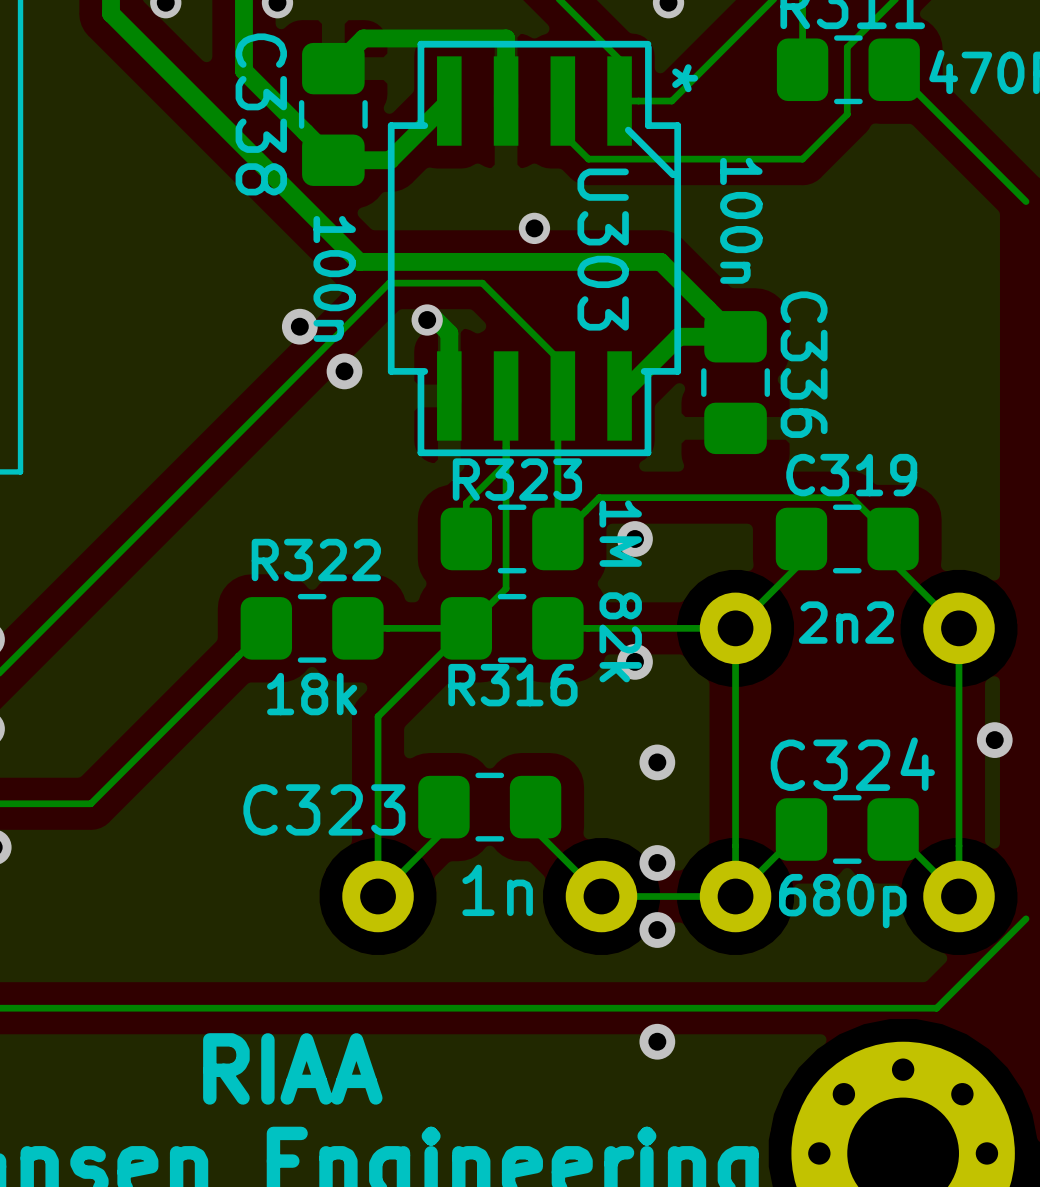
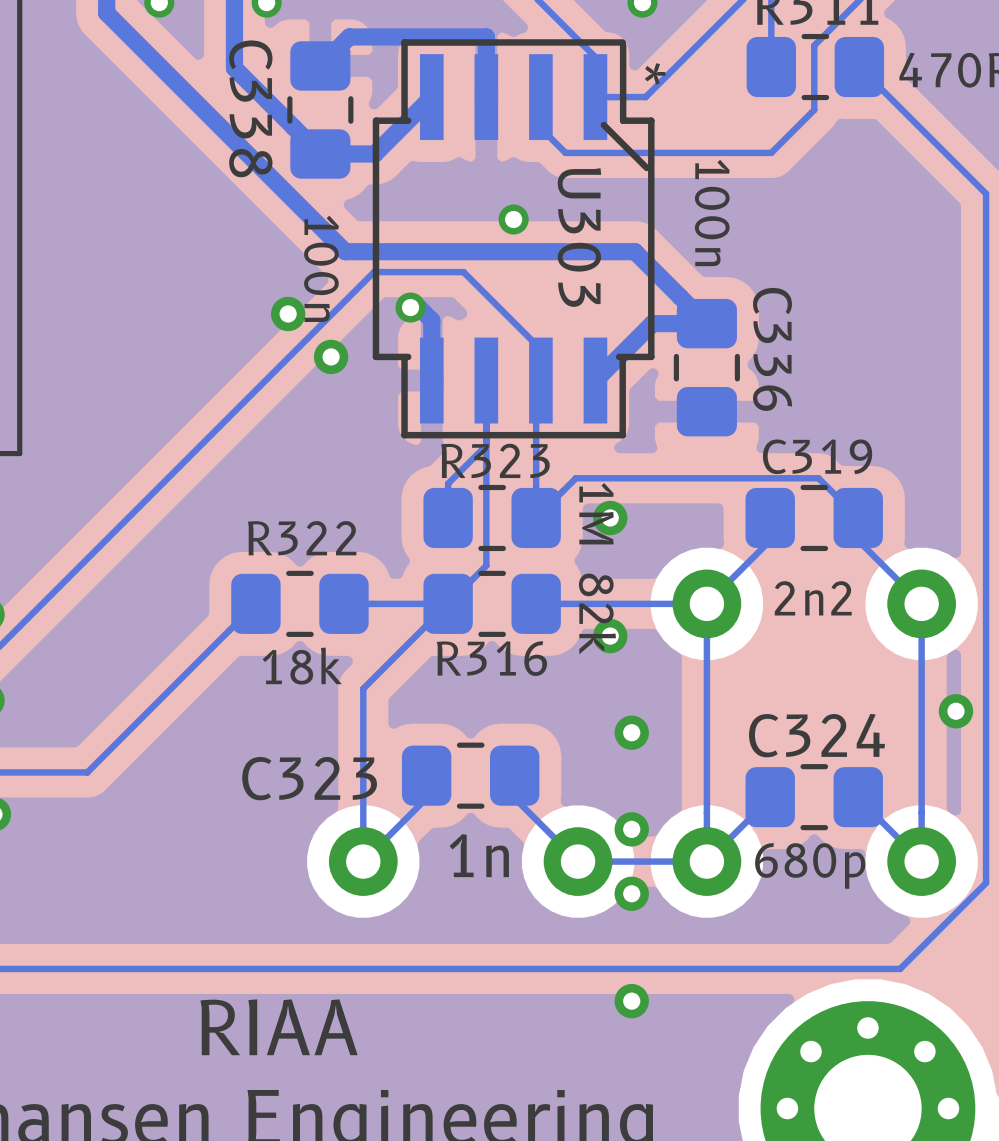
bottom track: none -> (986, 193) (986, 883)

